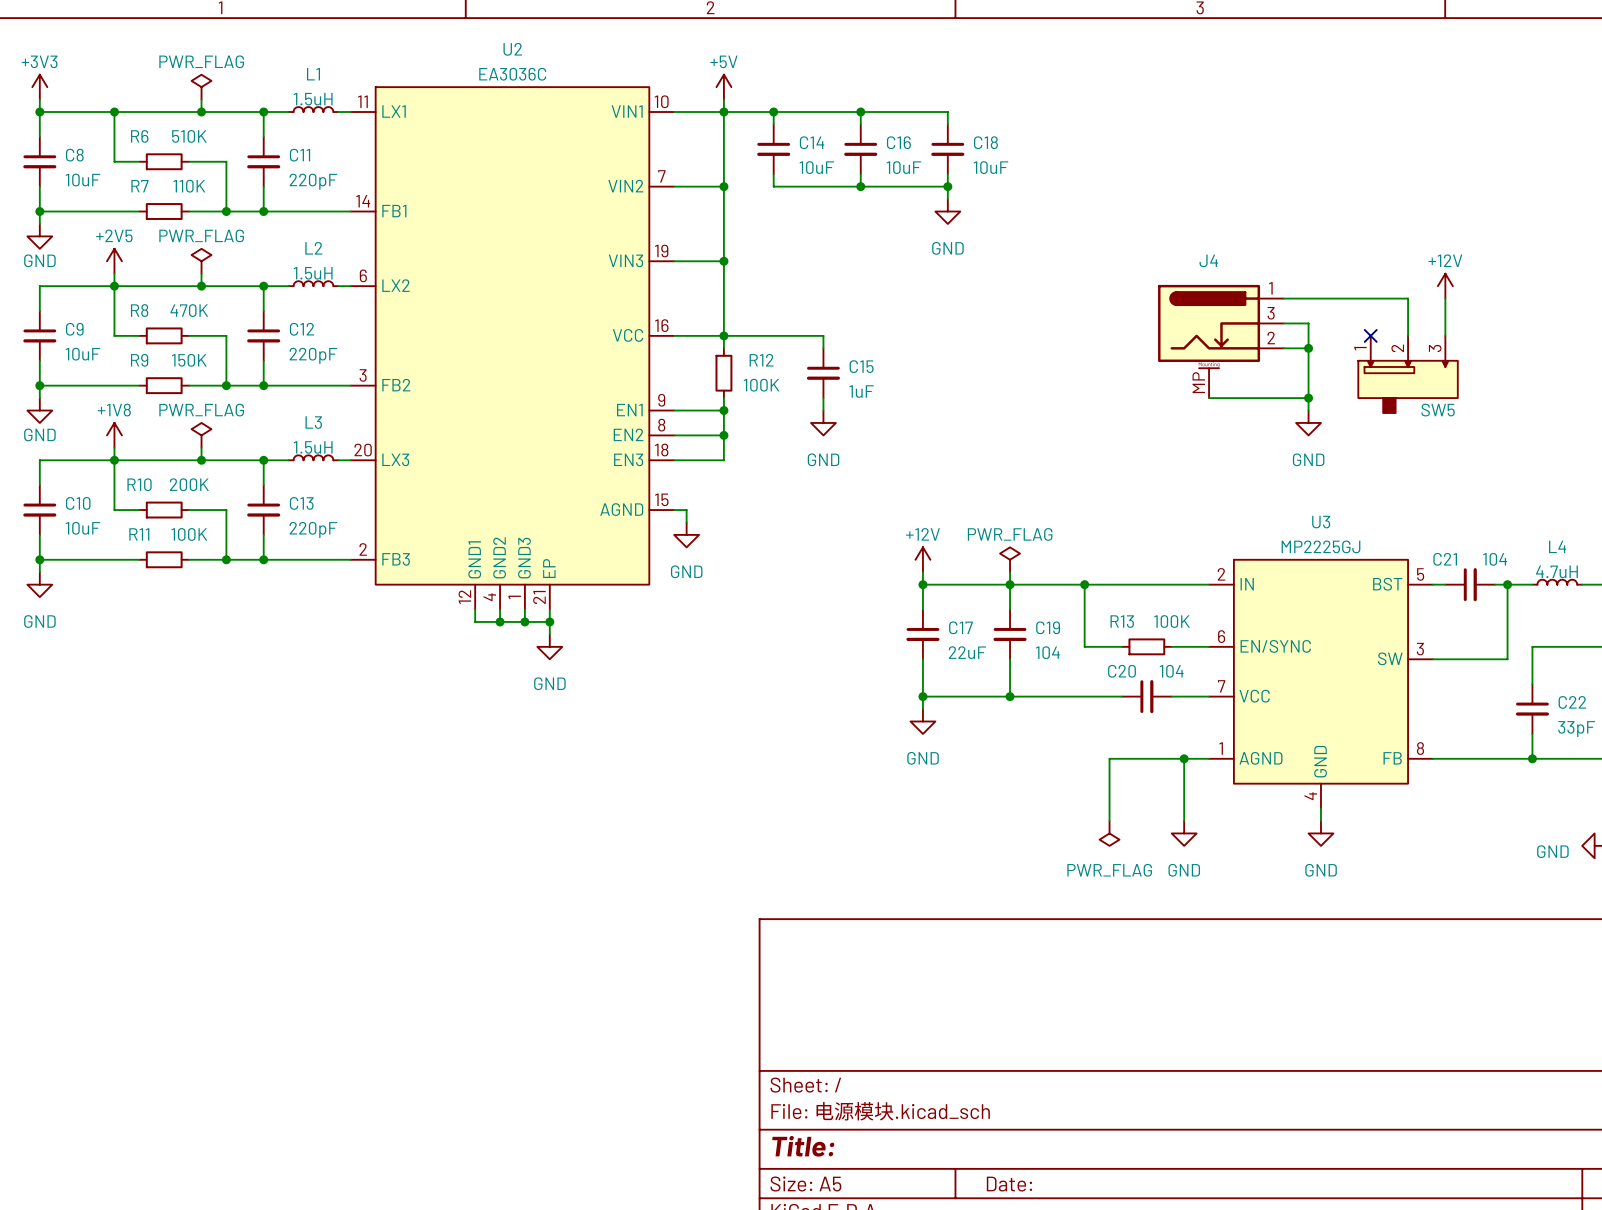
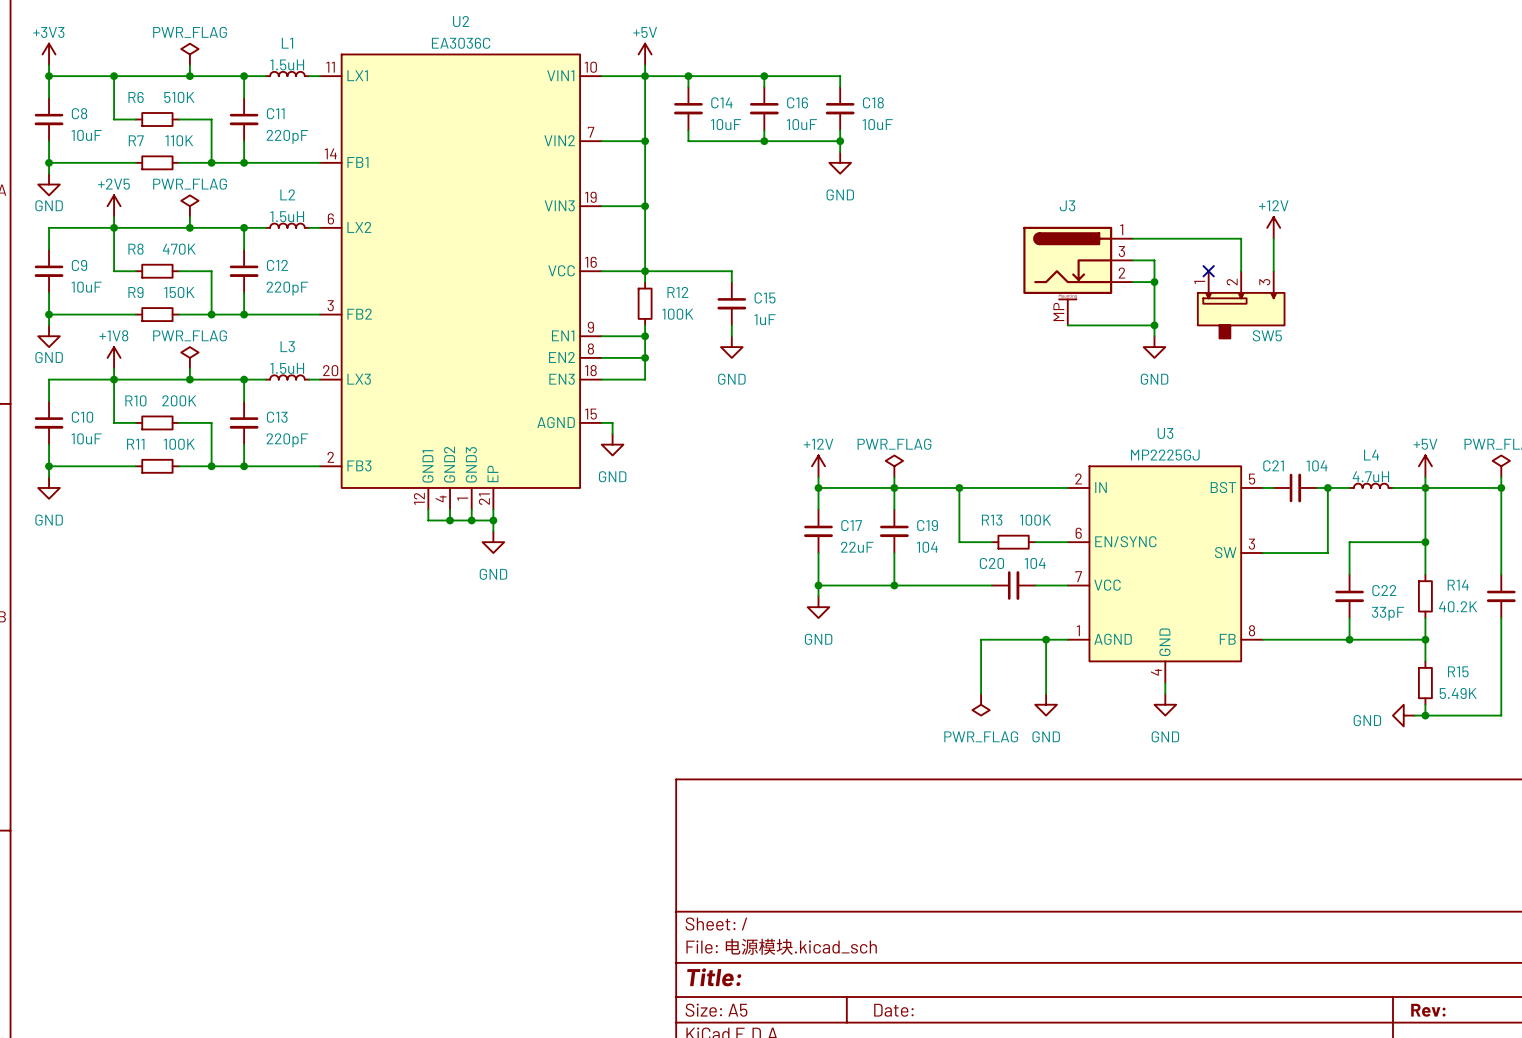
J4 name: J4 (1208, 260) -> J3 (1067, 205)

